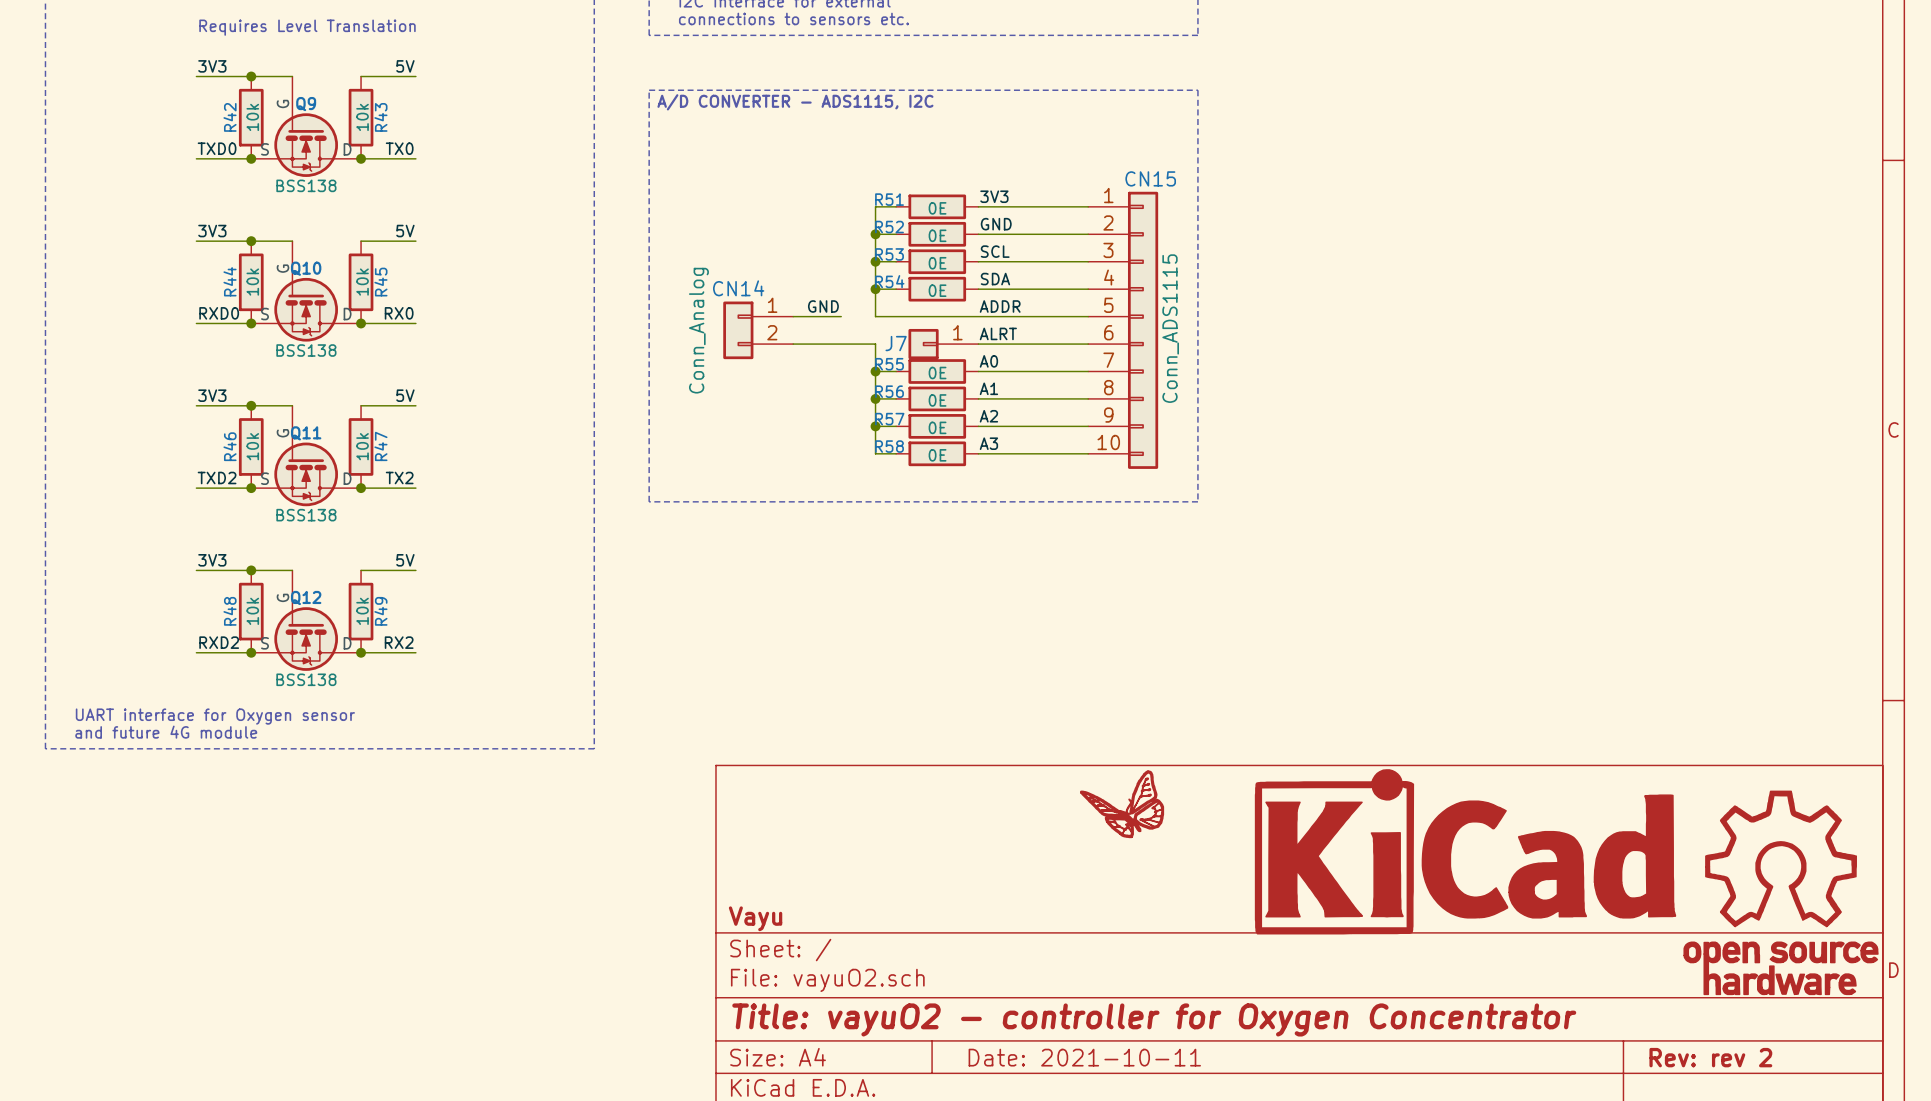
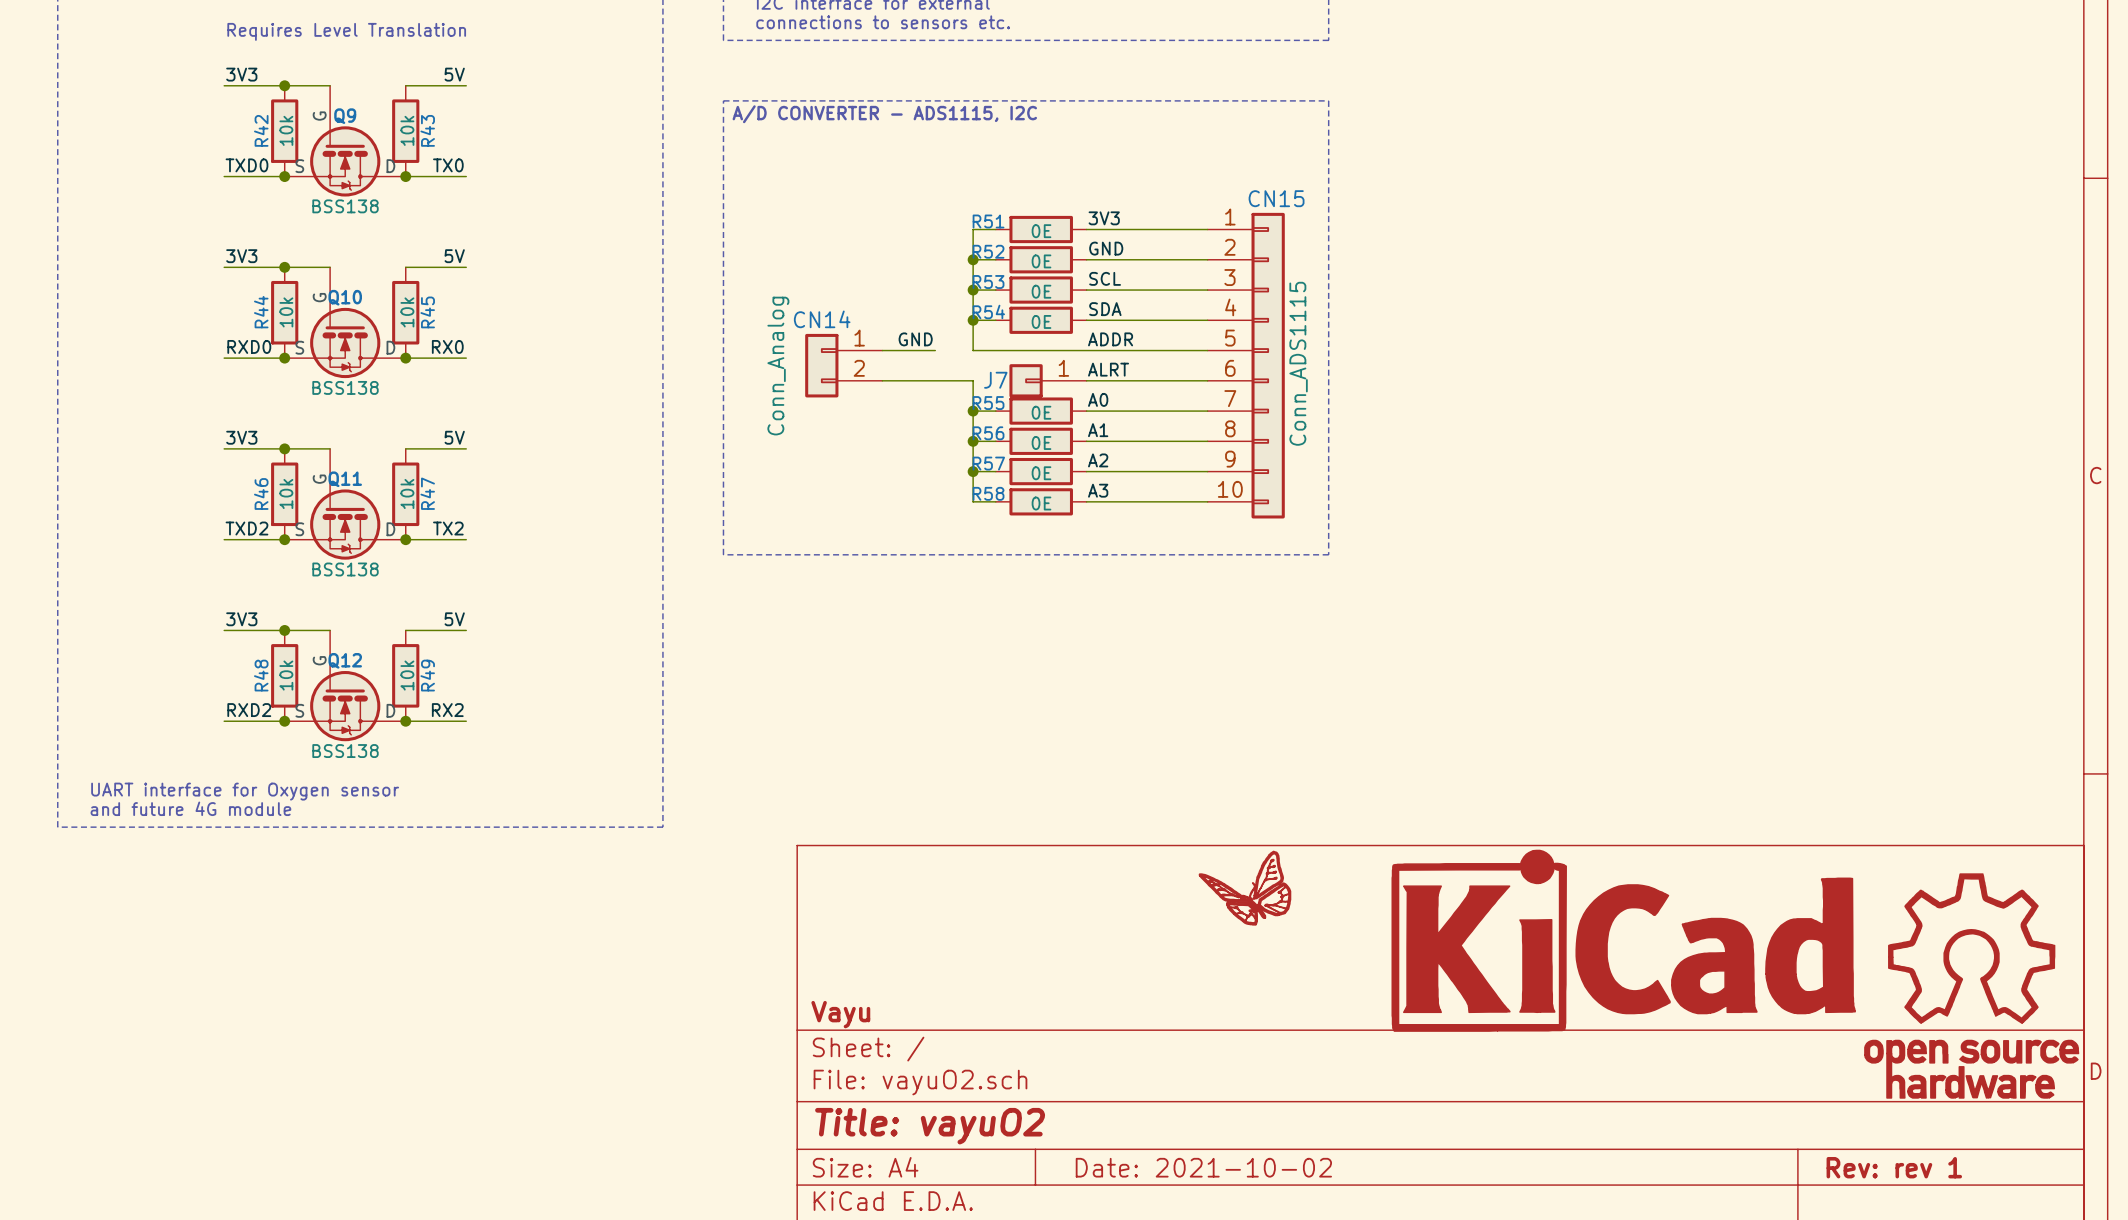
title block: Title: vayuO2 - controller for Oxygen Concentrator (1154, 1019) -> Title: vayuO2 (930, 1126)
title block: Date: 2021-10-11 (1084, 1057) -> Date: 2021-10-02 (1203, 1167)
title block: Rev: rev 2 (1710, 1057) -> Rev: rev 1 (1894, 1167)

